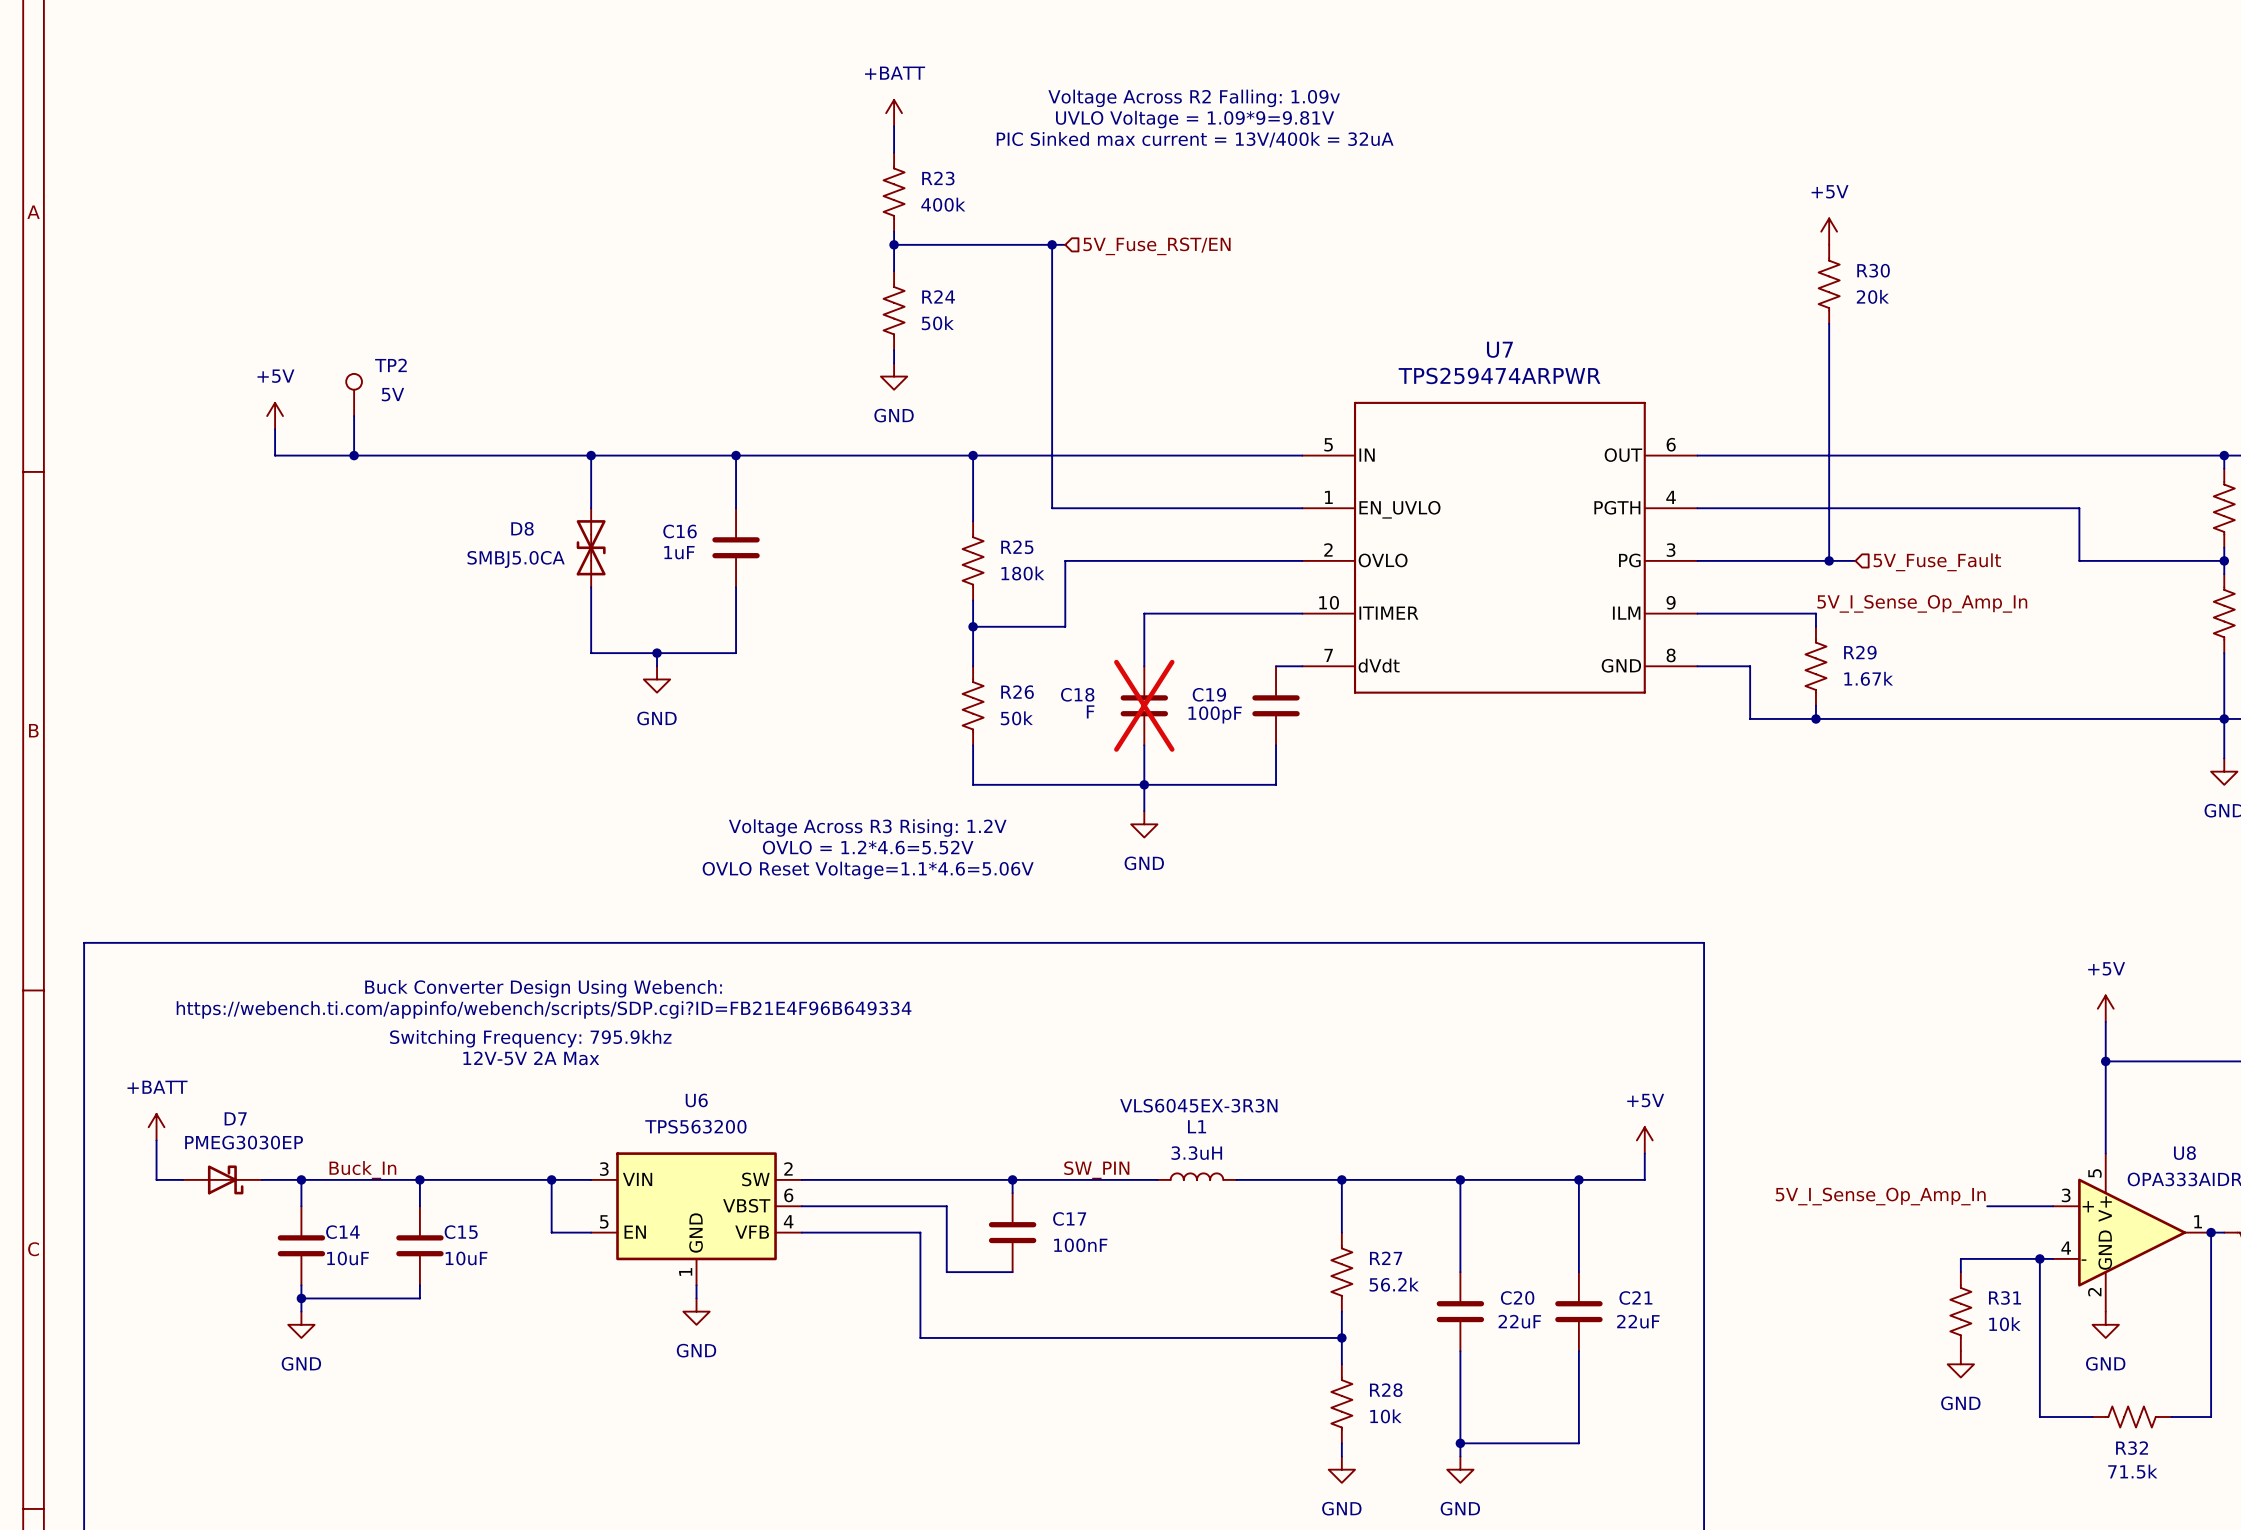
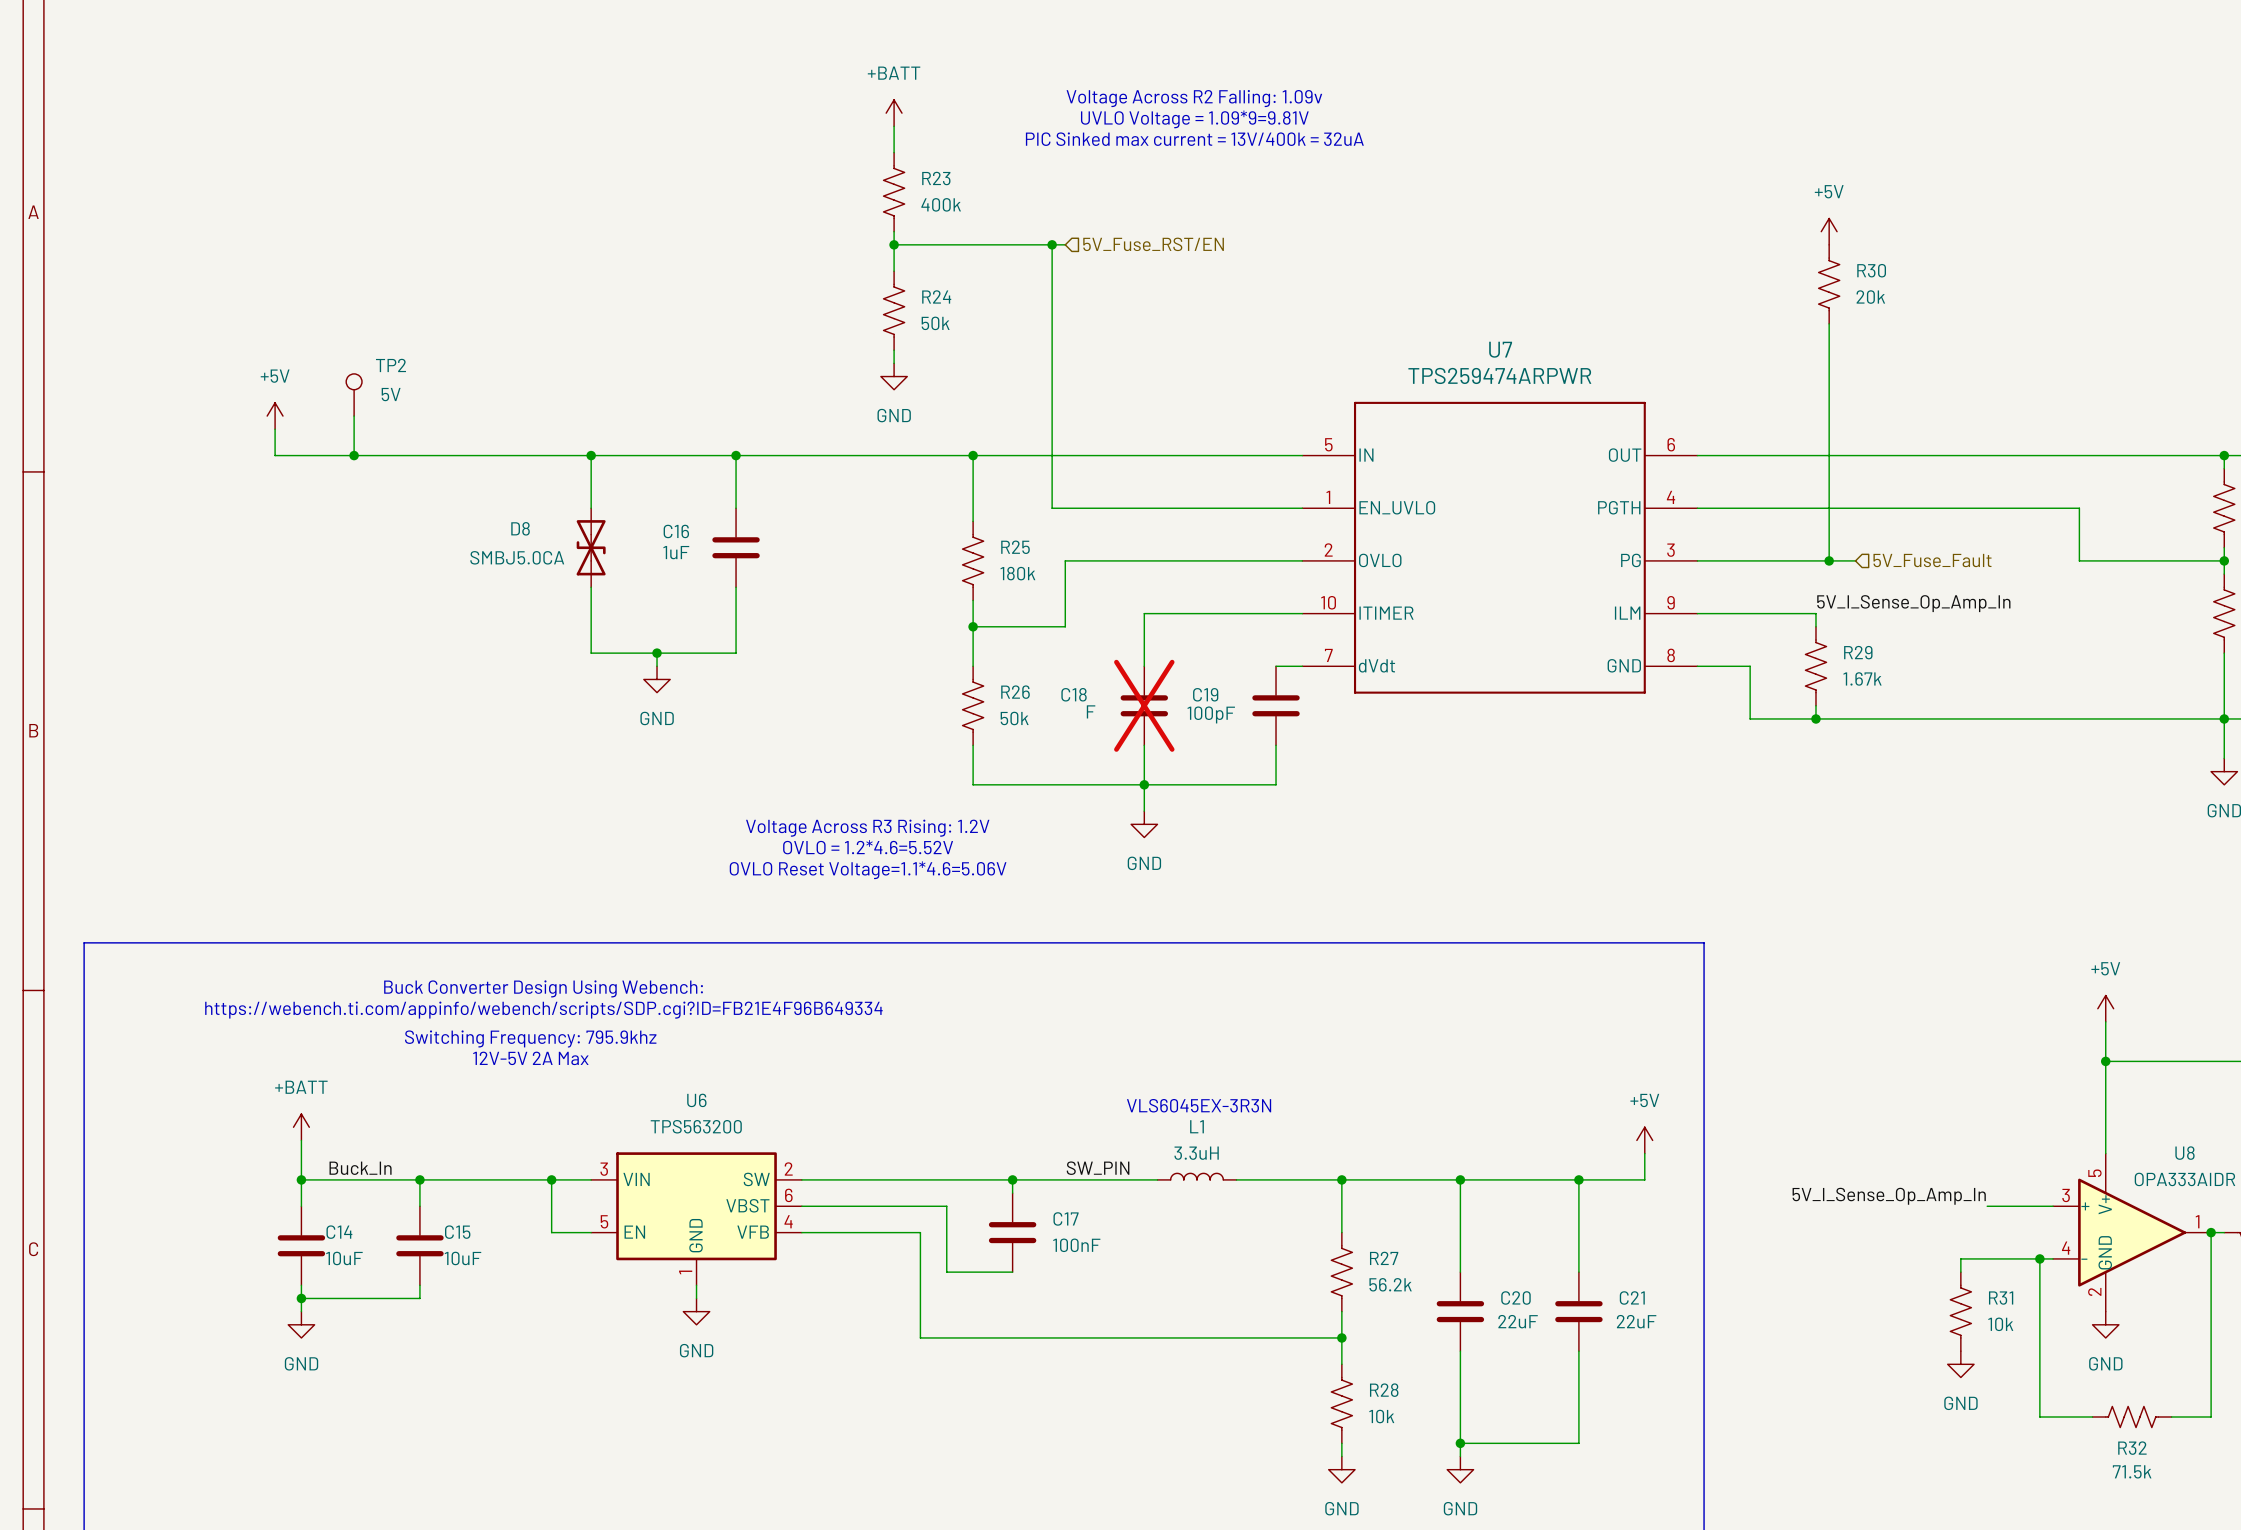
power symbol position: +BATT (156, 1127) -> +BATT (301, 1127)
wire: (156, 1140) (156, 1179) (182, 1179) -> none
D7: PMEG3030EP (222, 1179) -> none
wire: (261, 1179) (301, 1179) -> (301, 1140) (301, 1179)

